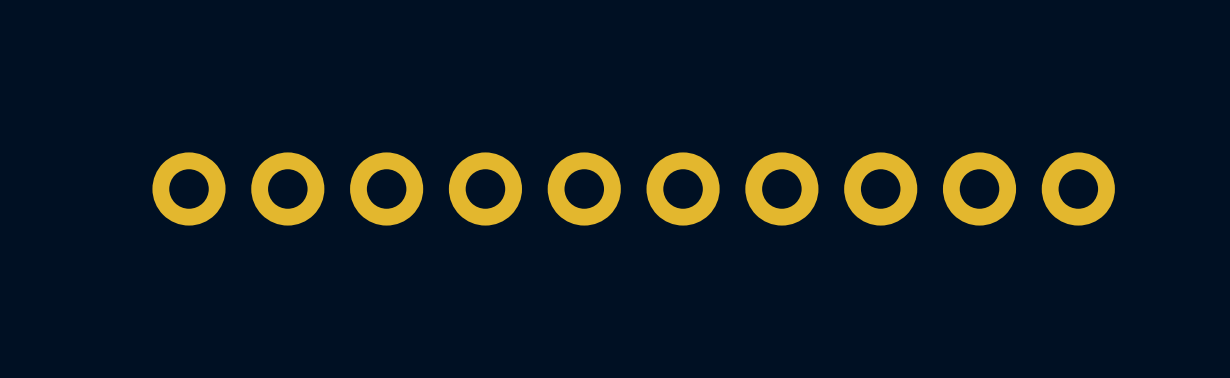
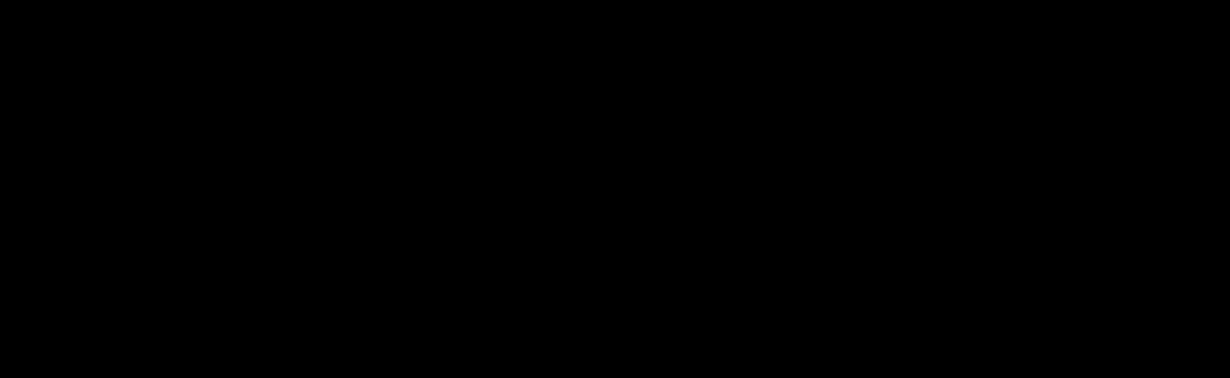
part: (633, 188) -> none

